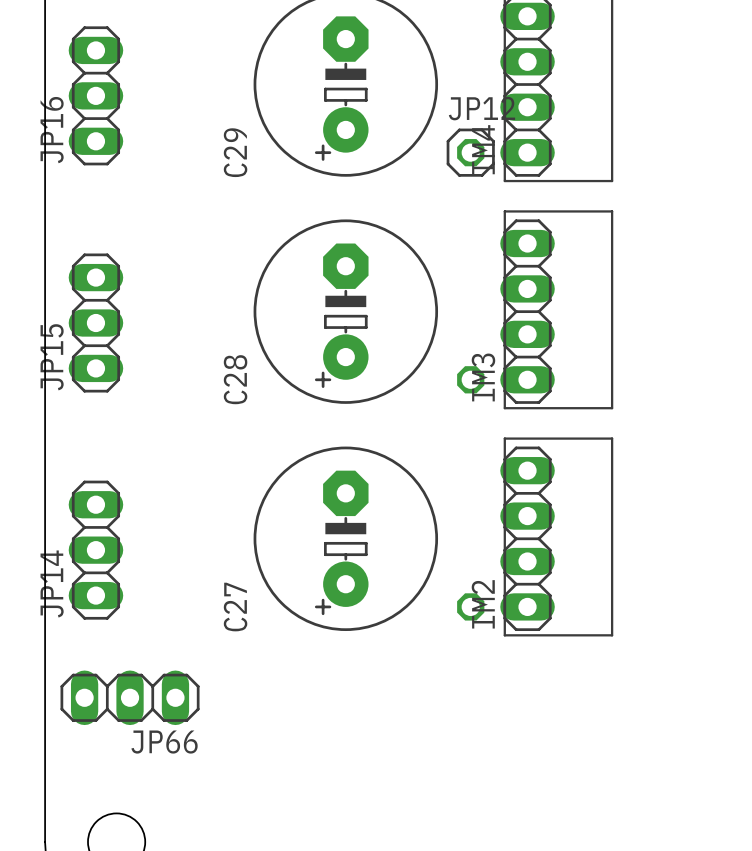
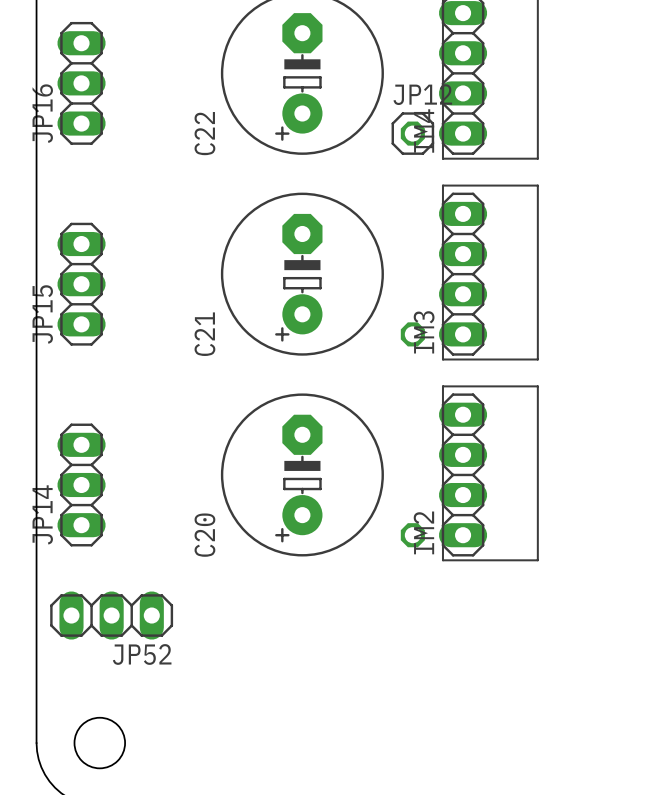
C29 name: C29 (235, 152) -> C22 (204, 133)
C28 name: C28 (235, 379) -> C21 (204, 334)
C27 name: C27 (235, 607) -> C20 (204, 535)
JP66 name: JP66 (164, 742) -> JP52 (142, 654)

